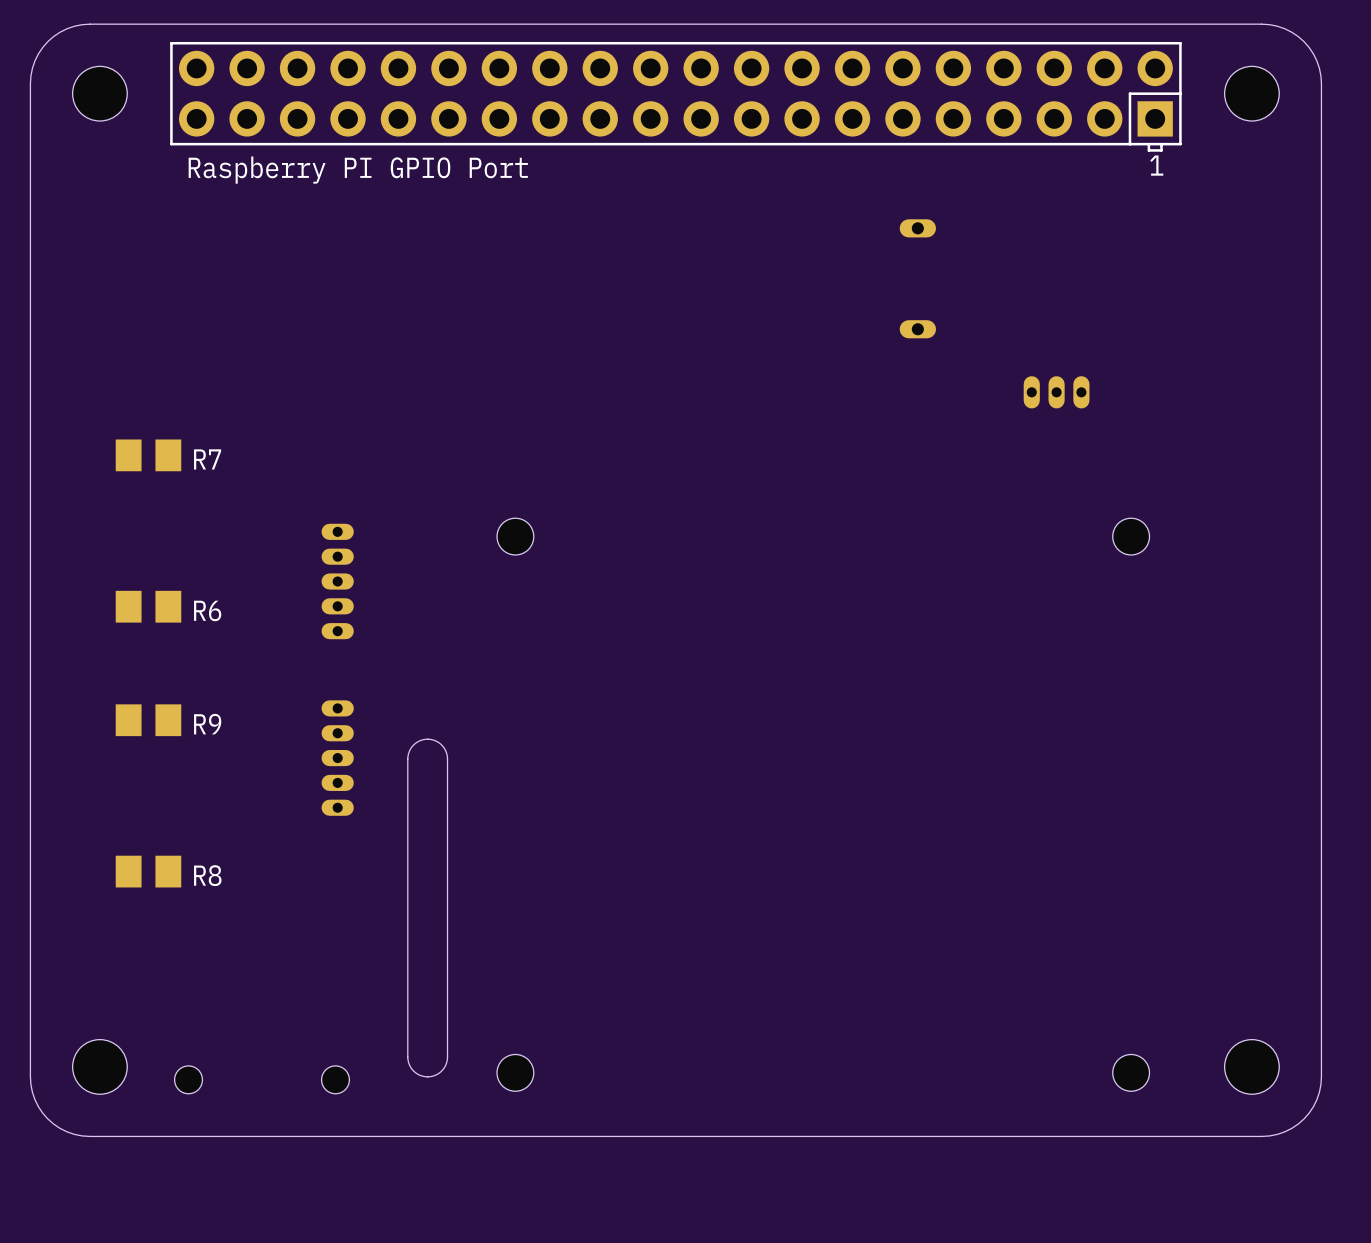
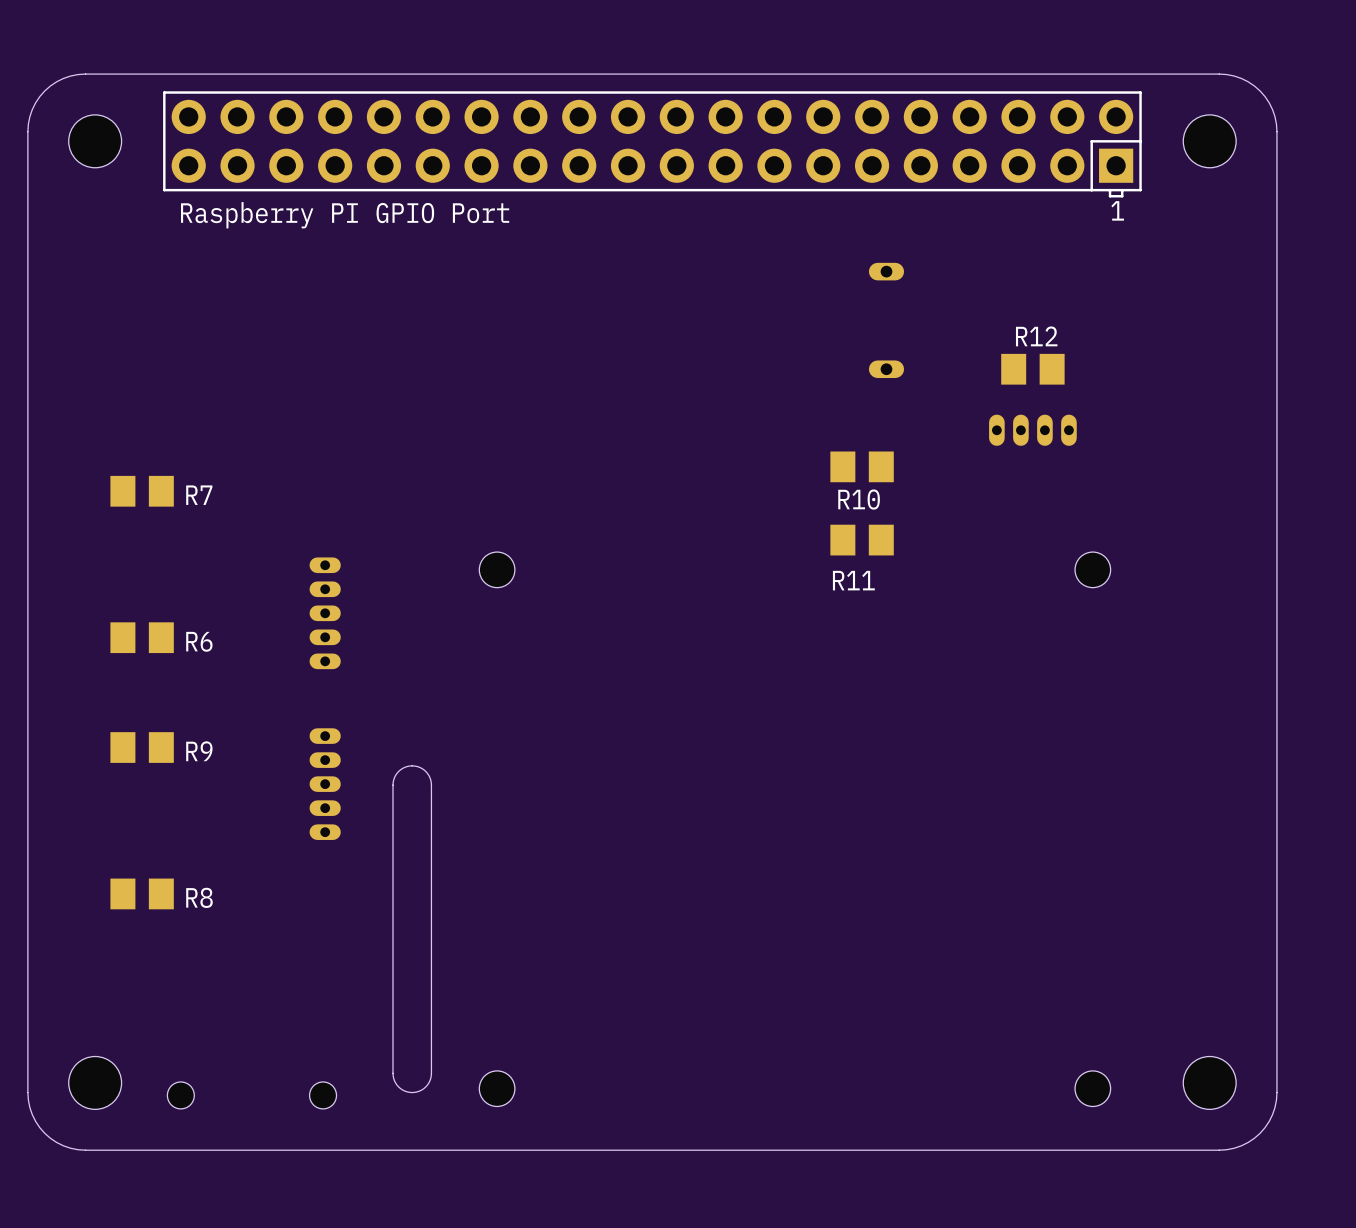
R12: none -> (1032, 369)
part footprint: [1023, 376, 1090, 409] -> [989, 414, 1077, 446]
R10: none -> (862, 466)
R11: none -> (862, 540)

